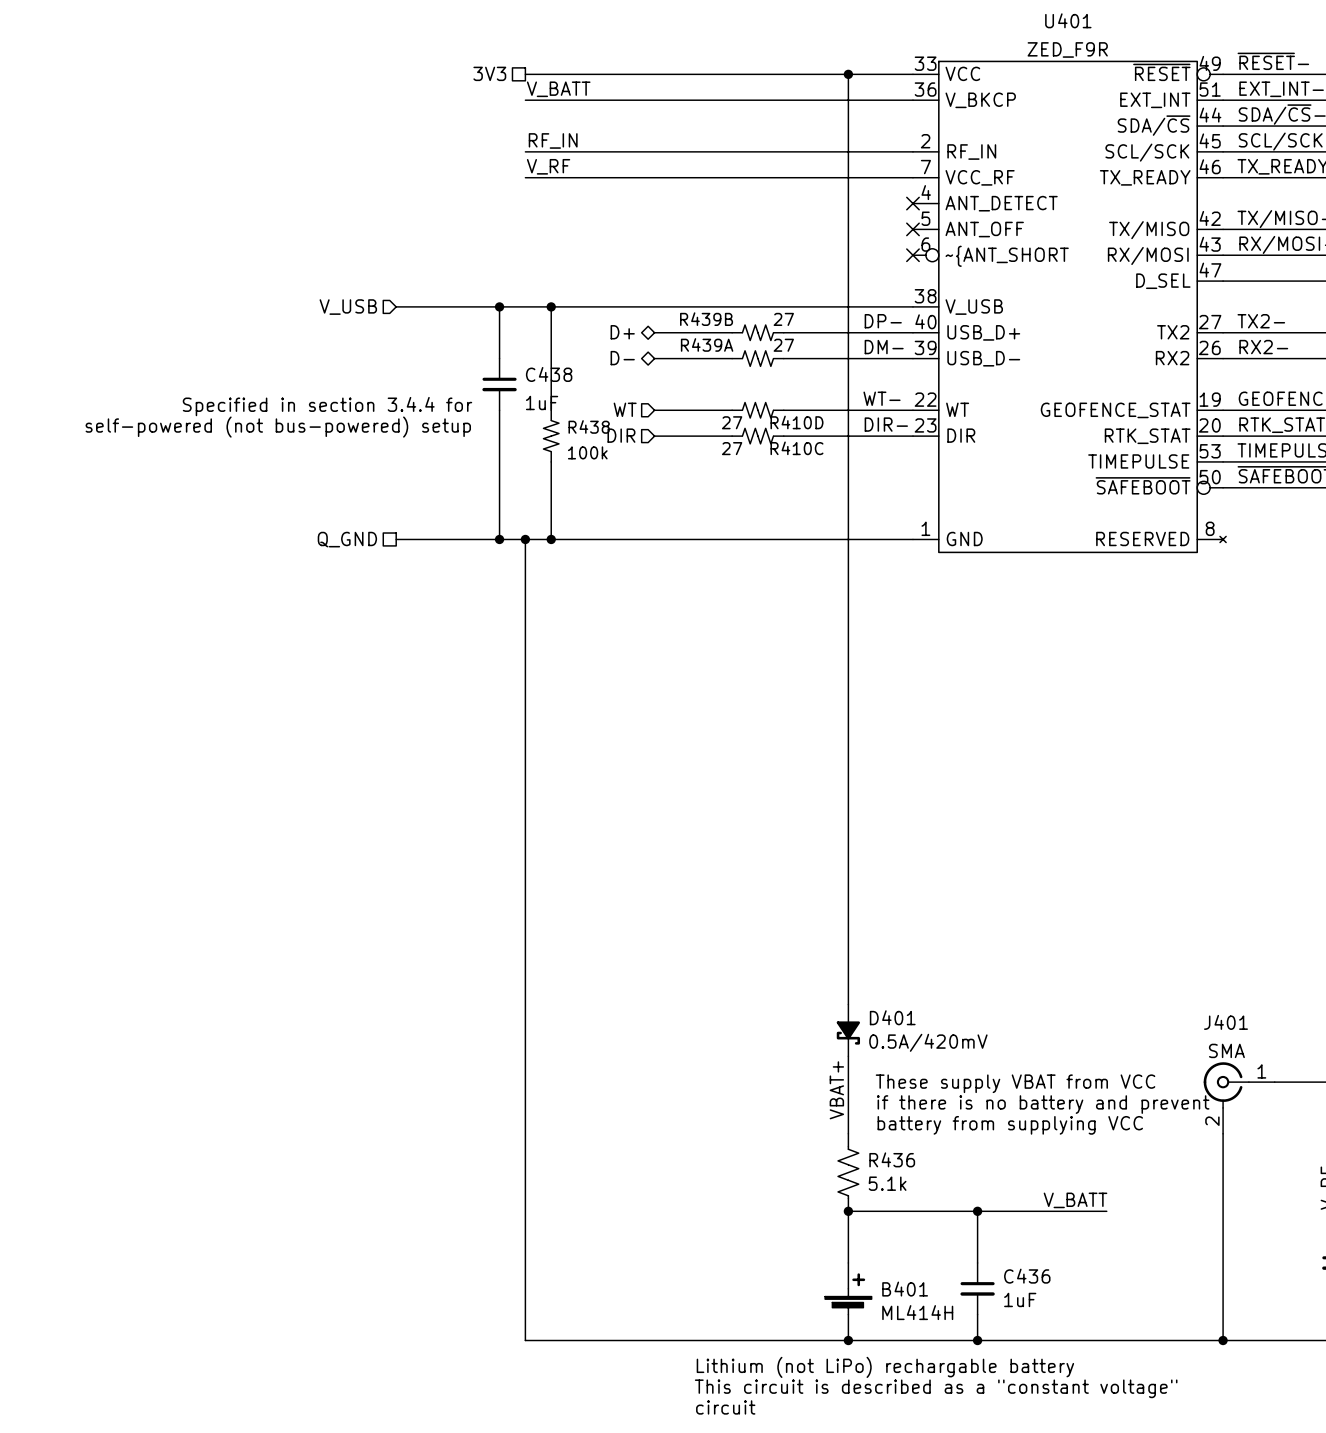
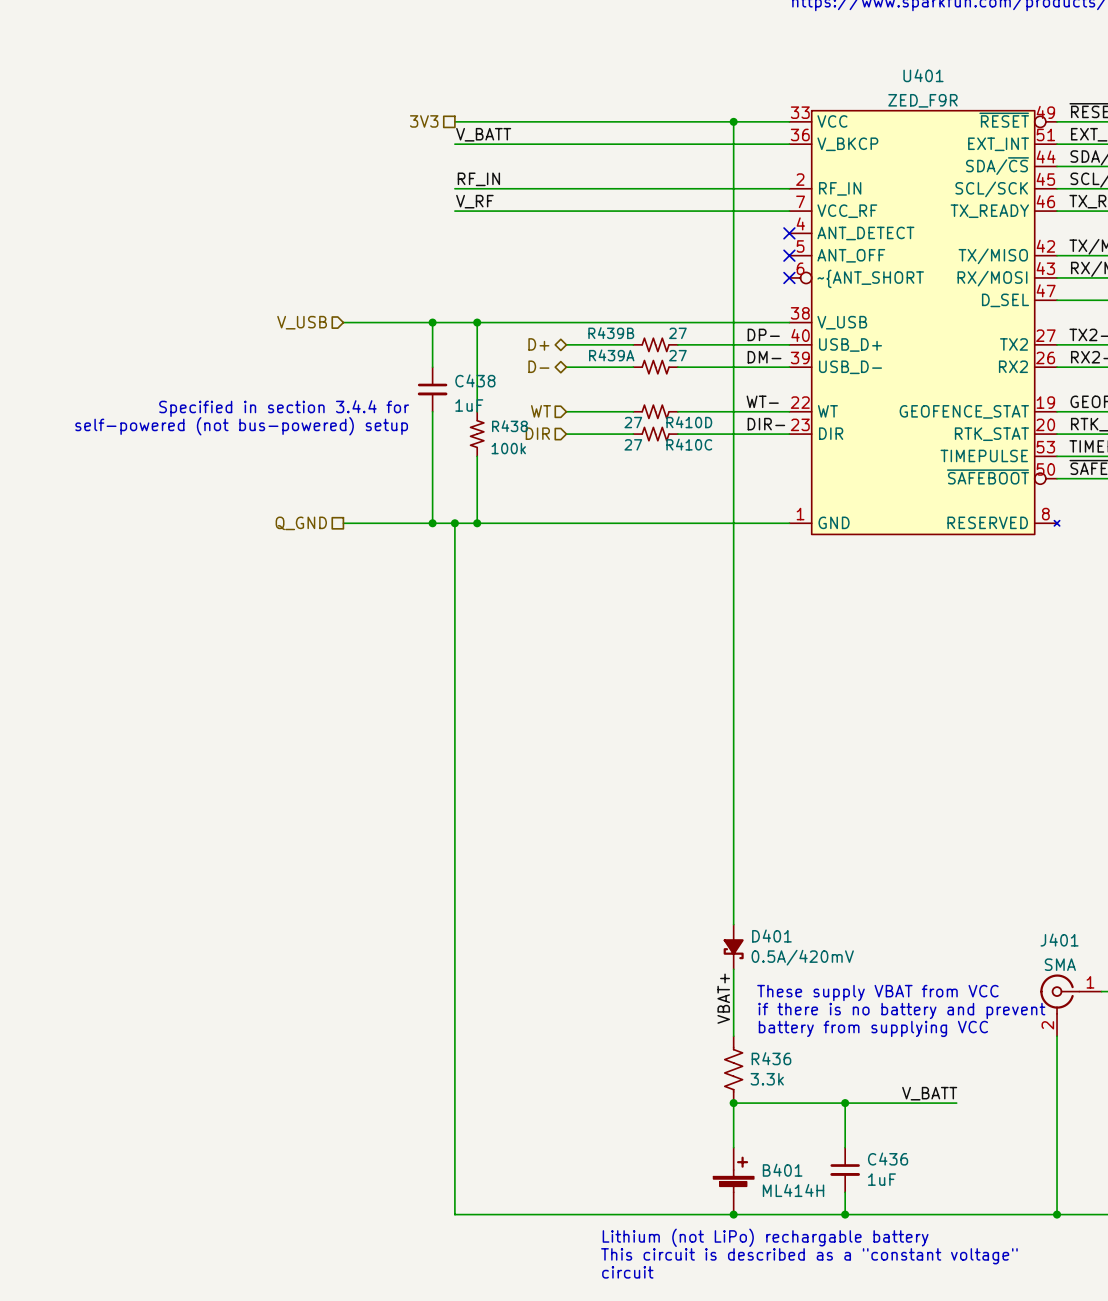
R436 value: 5.1k (887, 1183) -> 3.3k (767, 1079)

